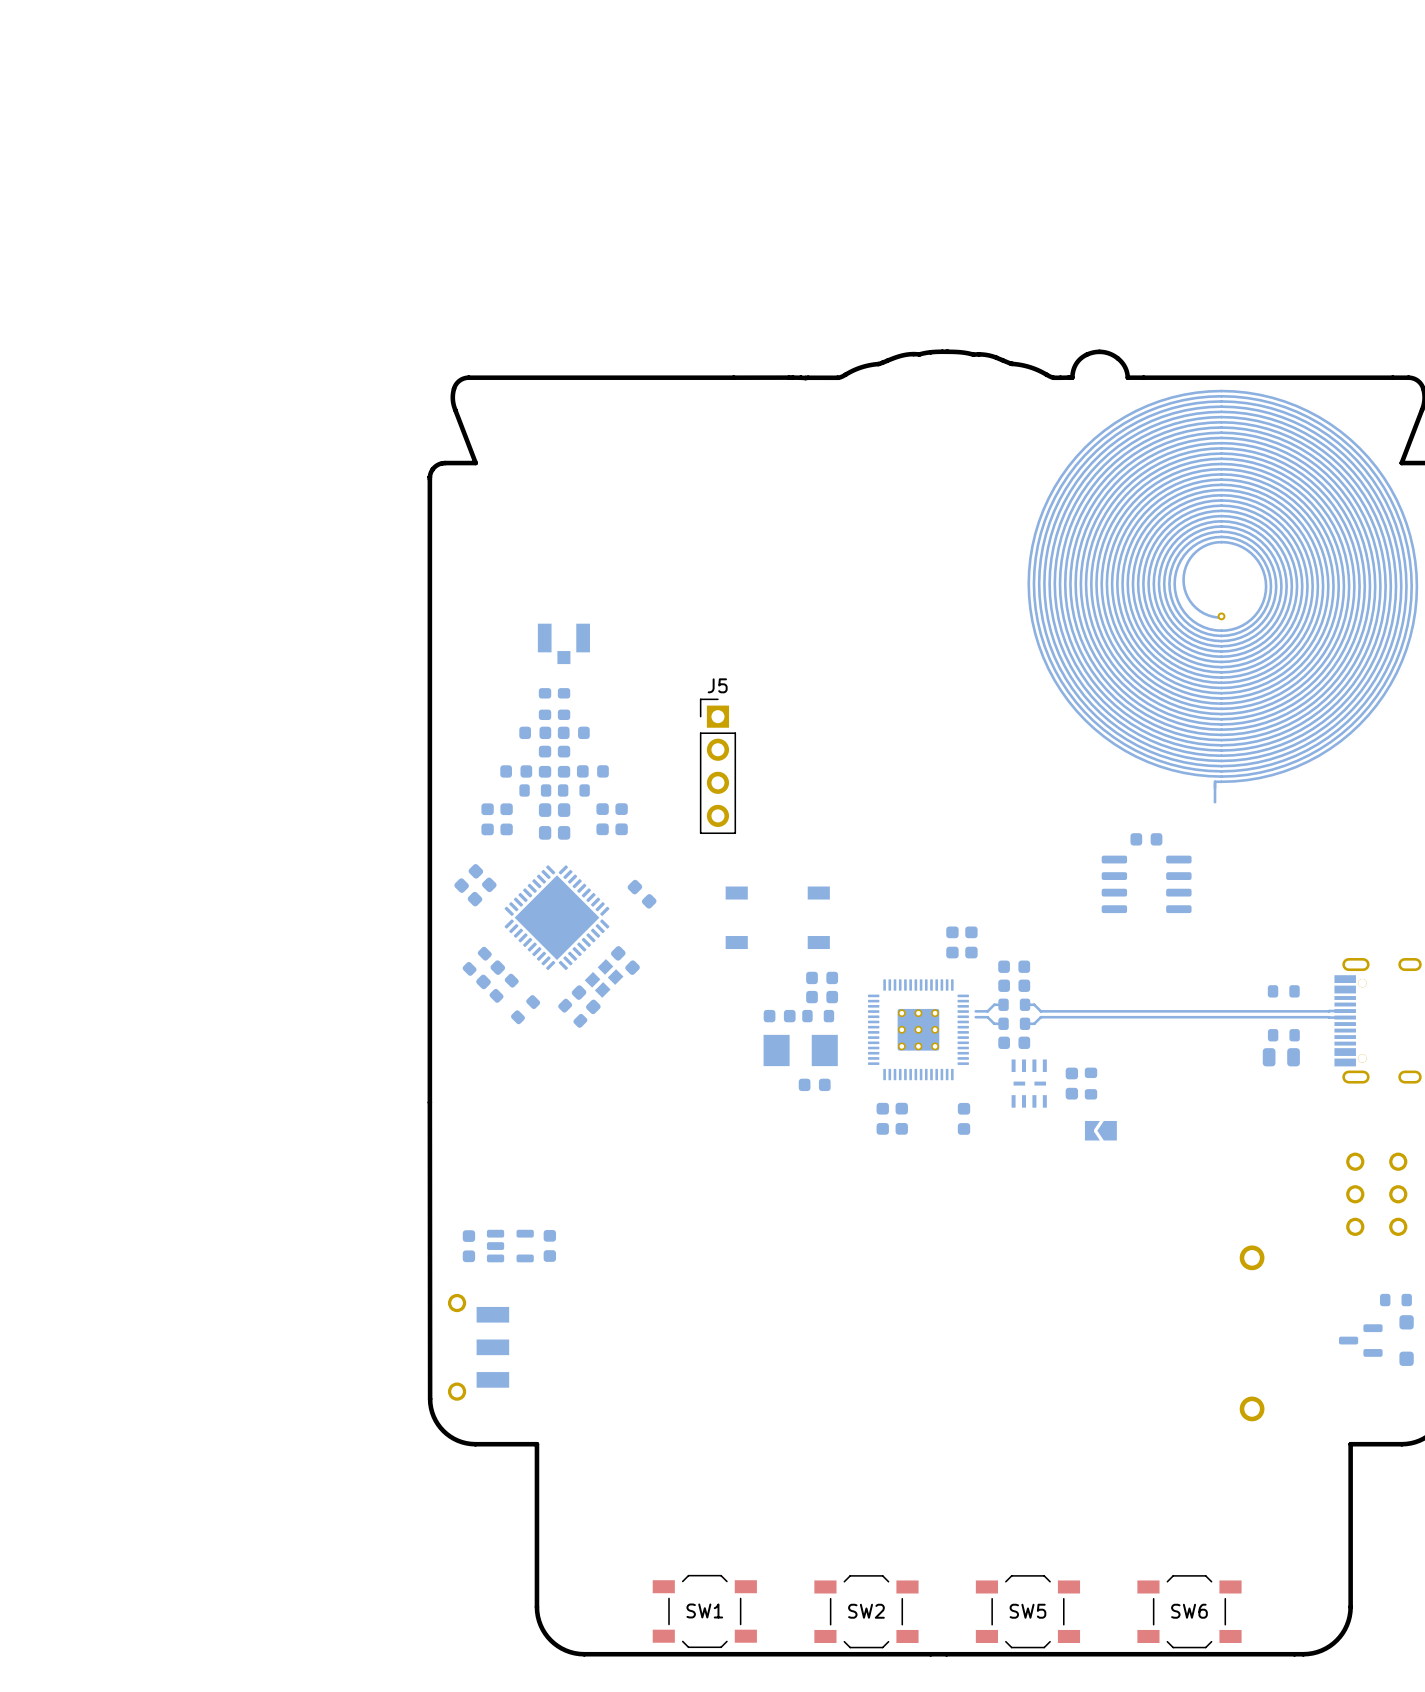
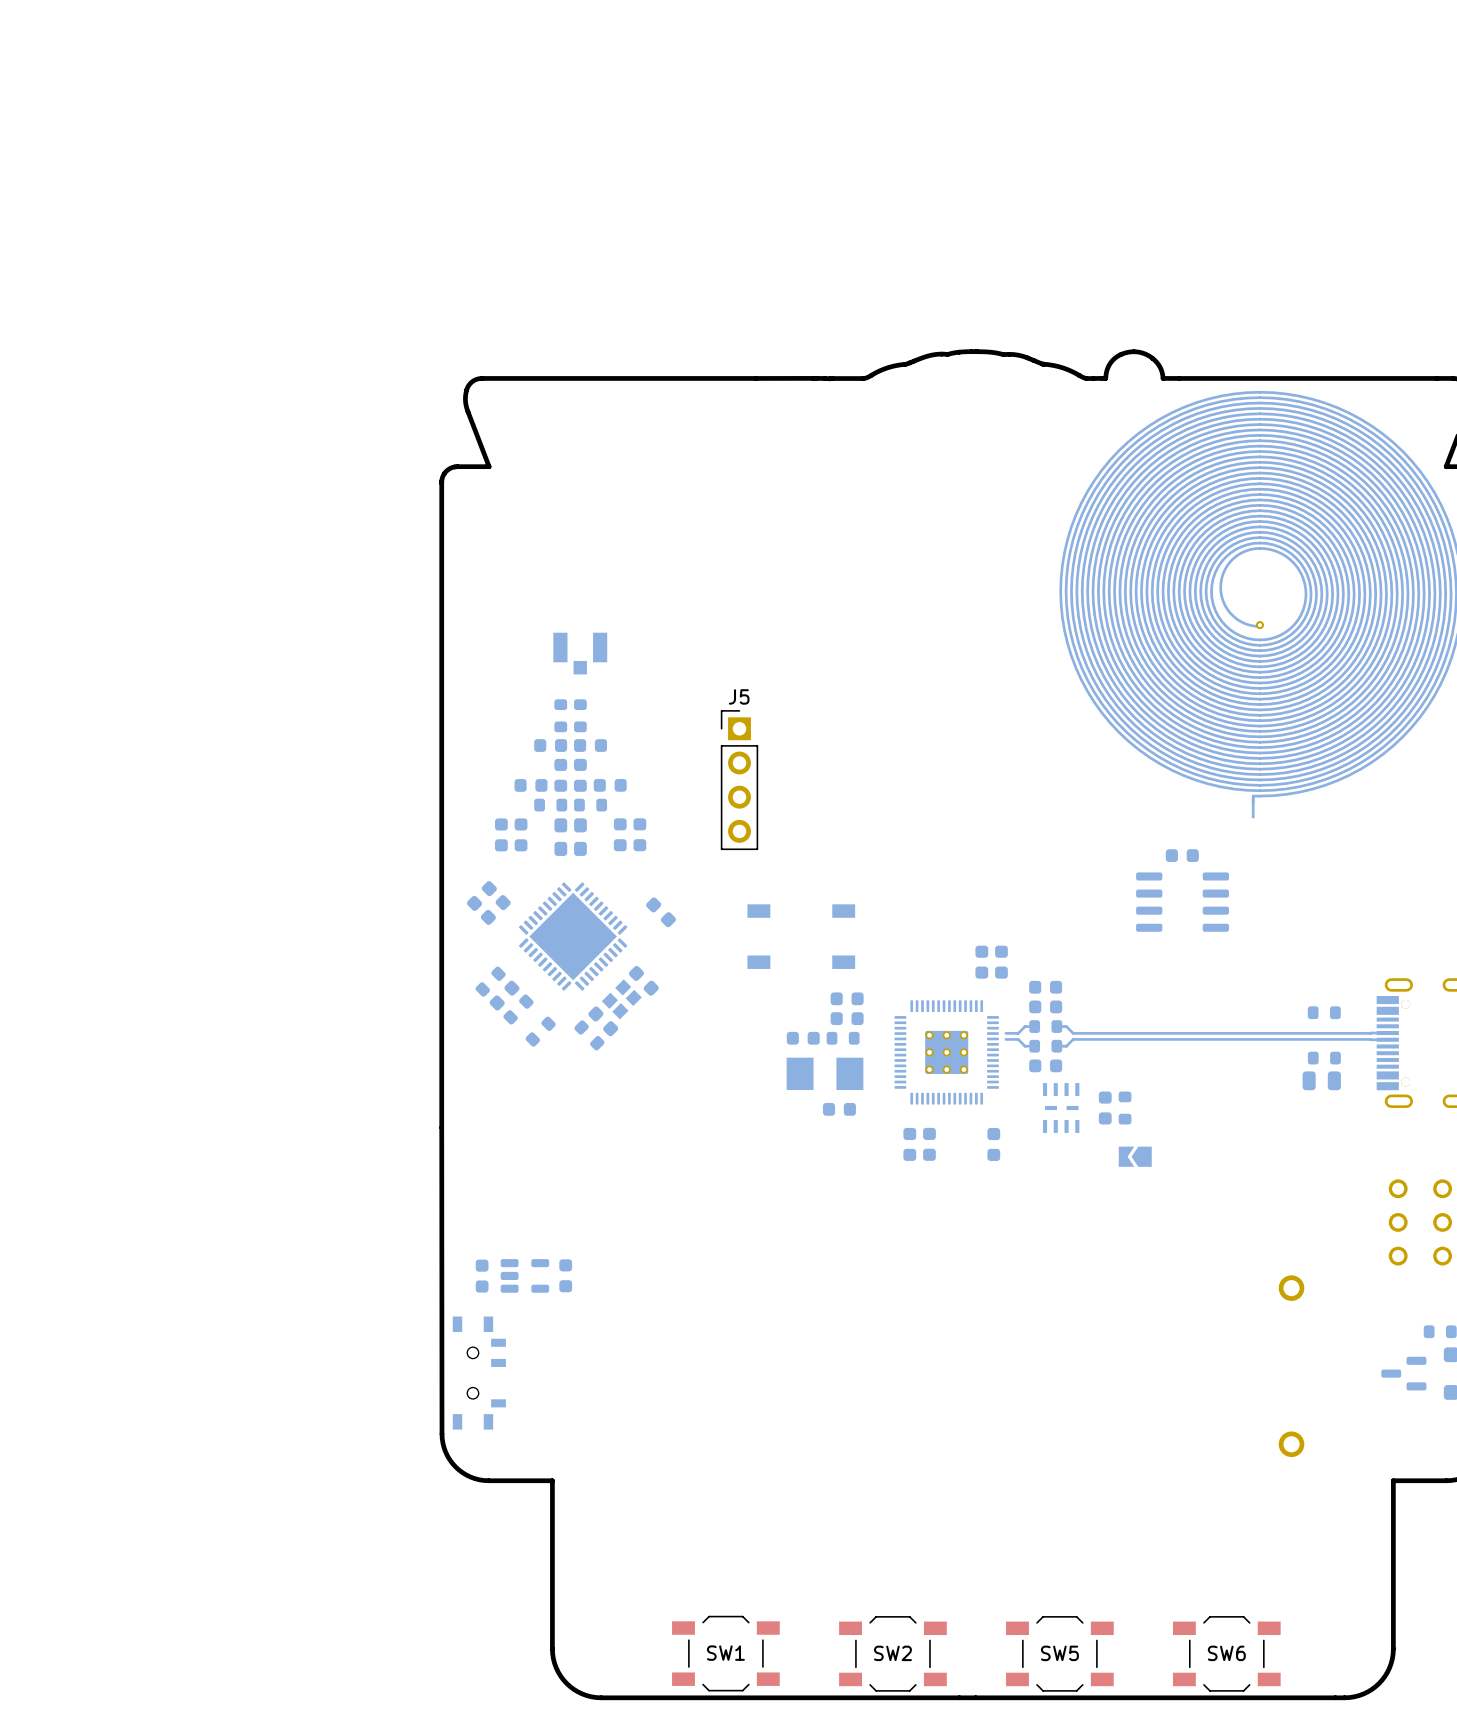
part: none -> (479, 1373)
part: (478, 1347) -> none

